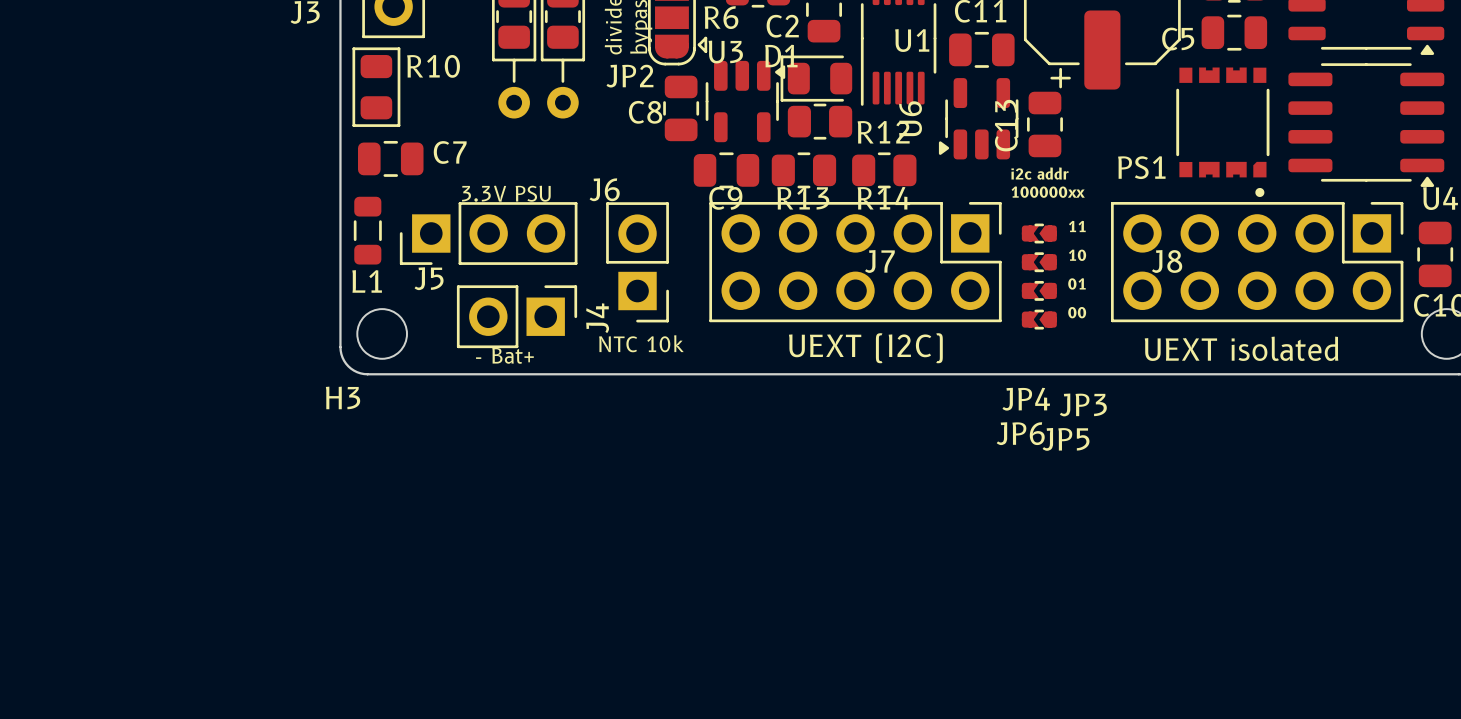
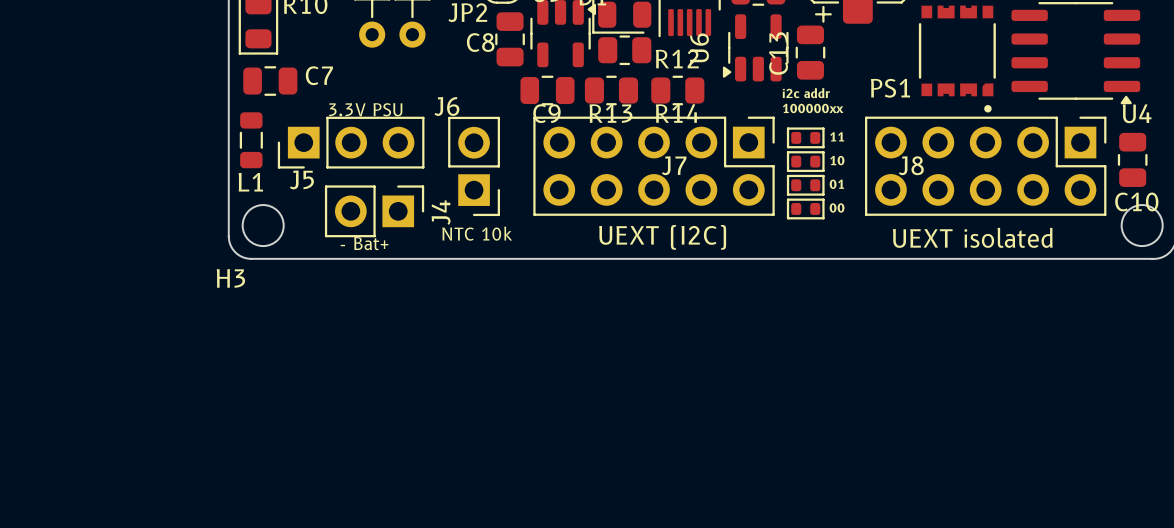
part: none -> (805, 137)
JP5: (1039, 233) -> none
part: none -> (805, 161)
JP6: (1039, 262) -> none
part: none -> (805, 185)
JP3: (1039, 290) -> none
part: none -> (805, 208)
JP4: (1039, 319) -> none

